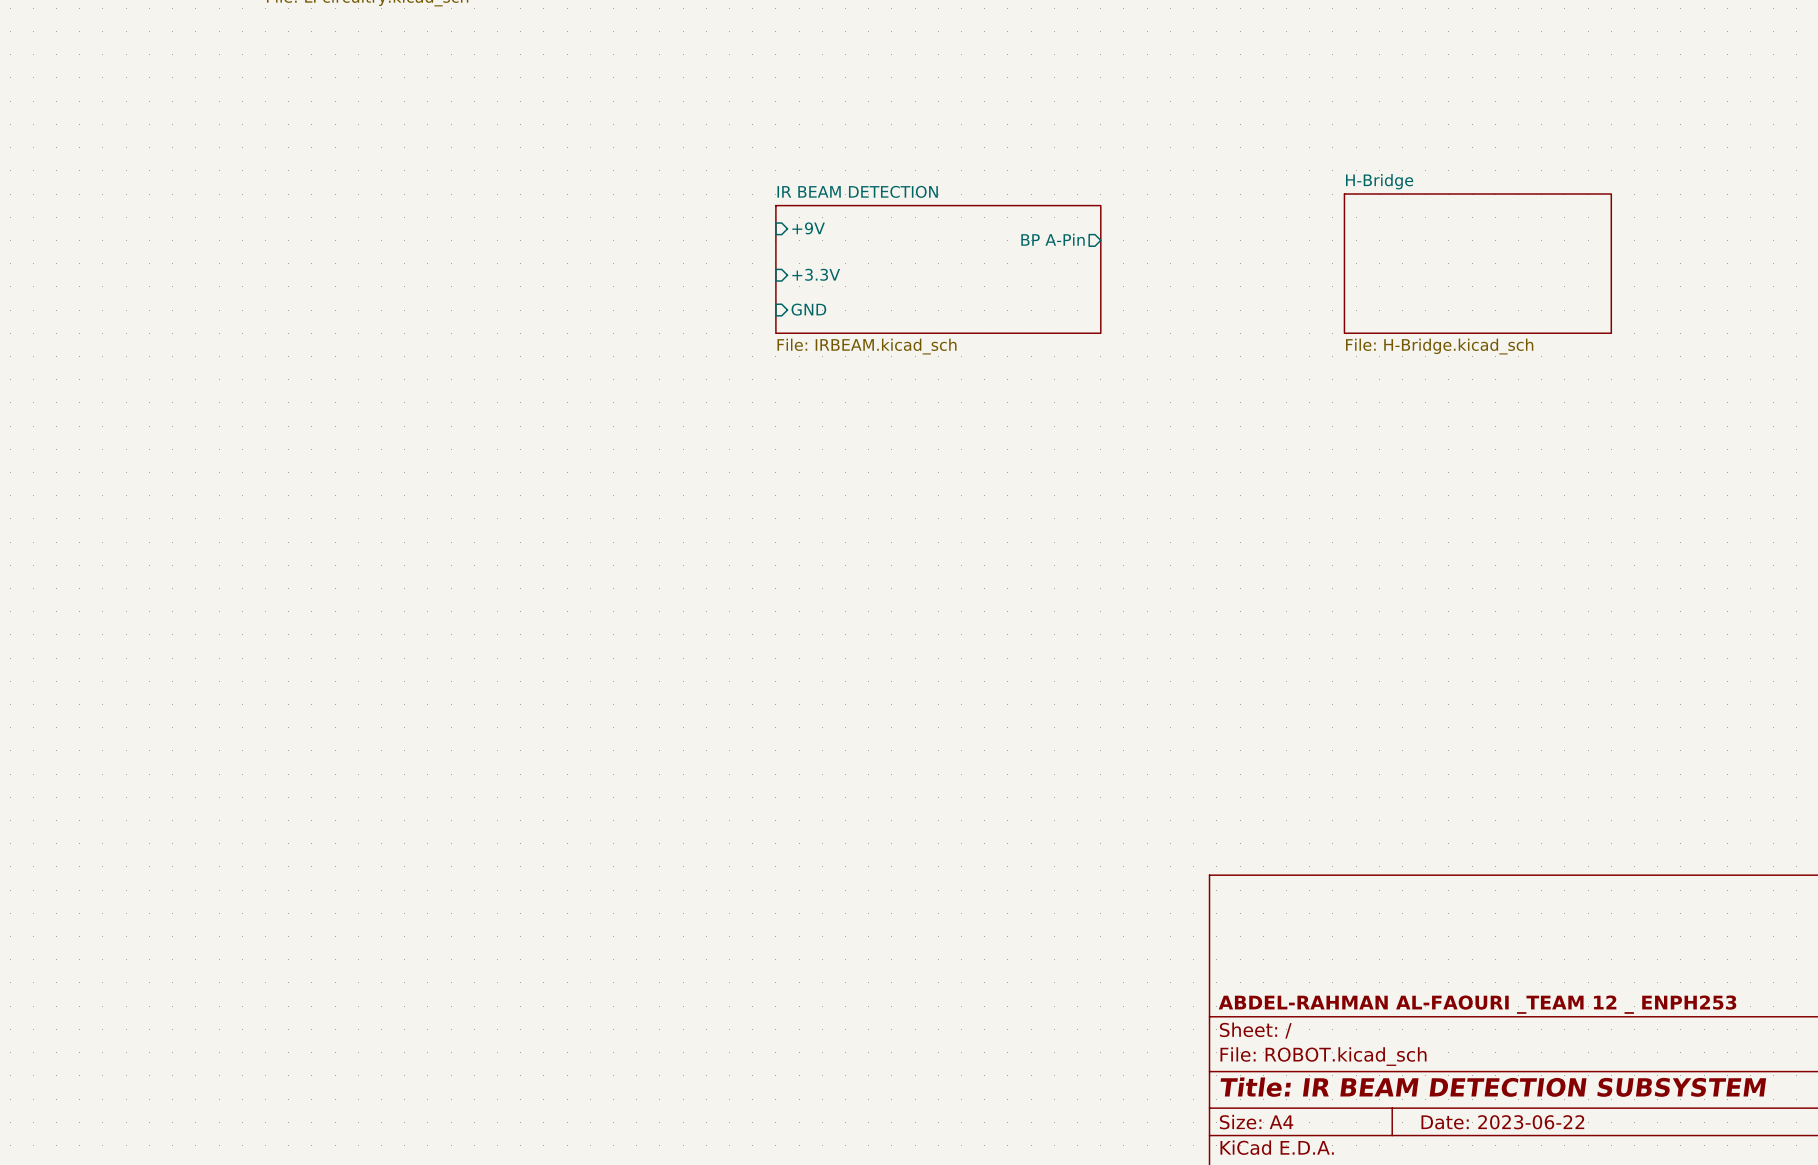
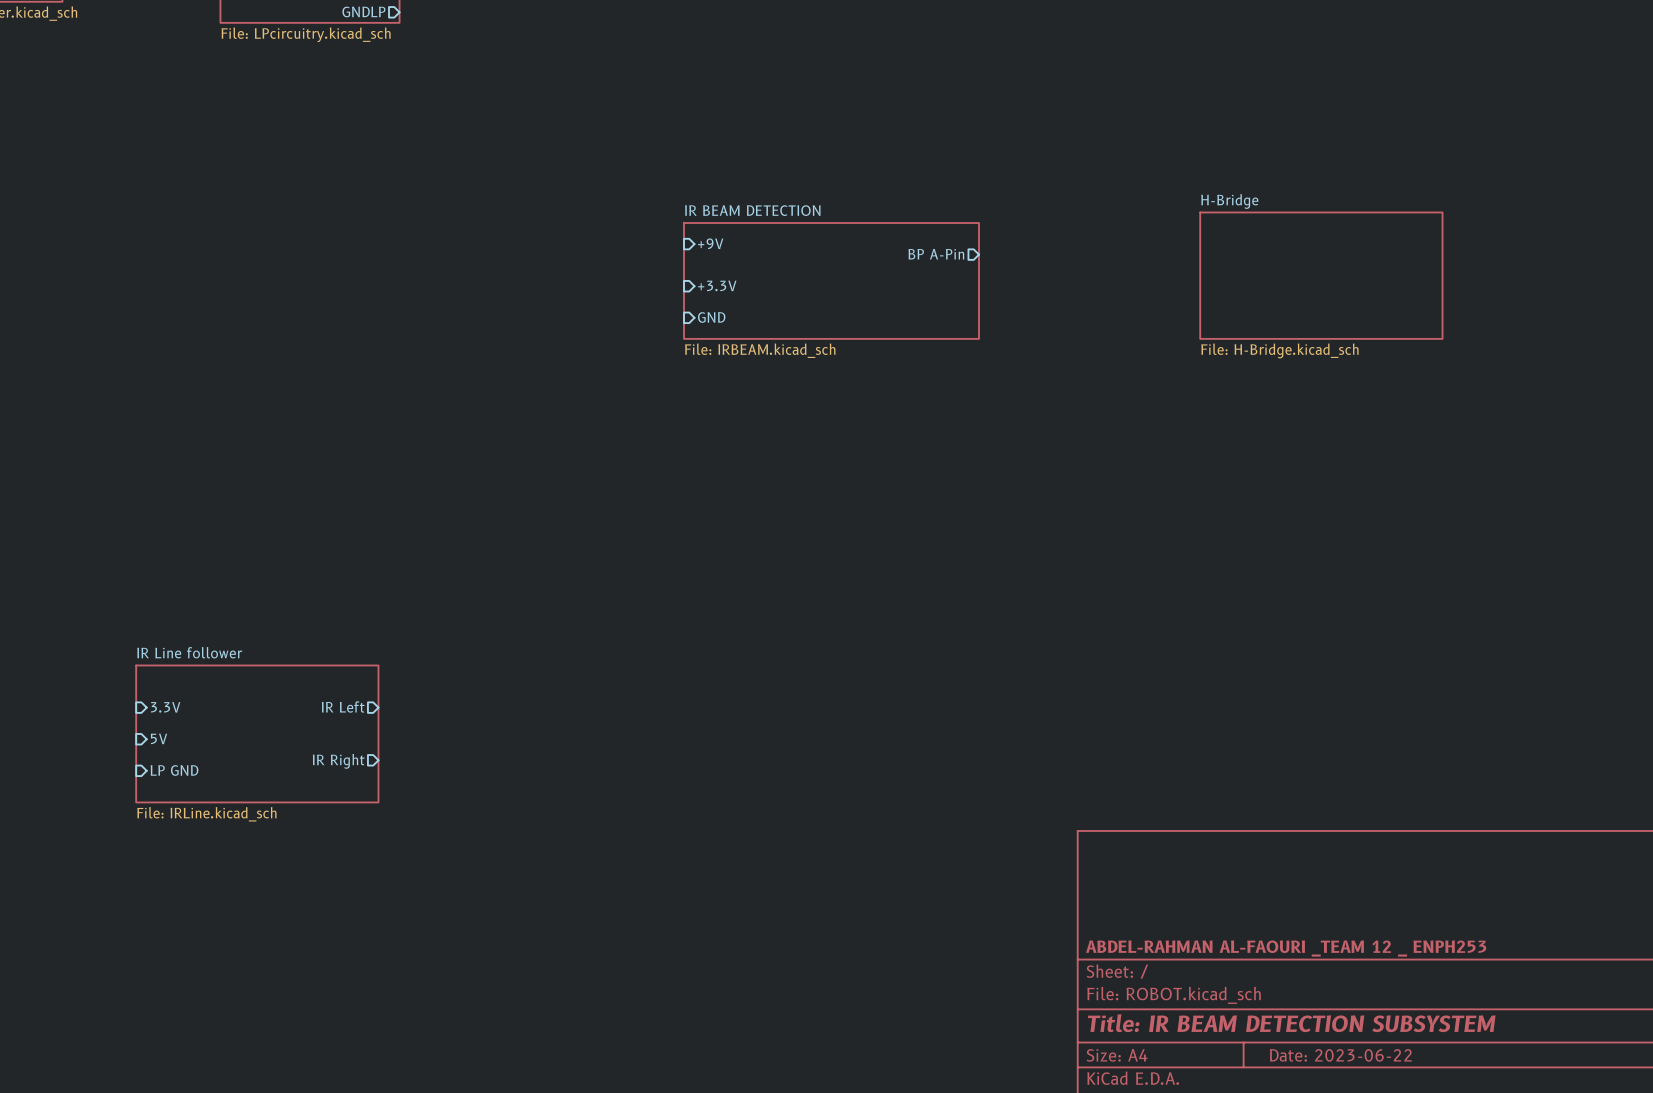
sheet pin: none -> 3.3V (165, 707)
sheet pin: none -> IR Left (343, 706)
sheet IR Line follower: none -> File: IRLine.kicad_sch (257, 733)
sheet pin: none -> 5V (159, 738)
sheet pin: none -> IR Right (338, 761)
sheet pin: none -> LP GND (174, 770)

